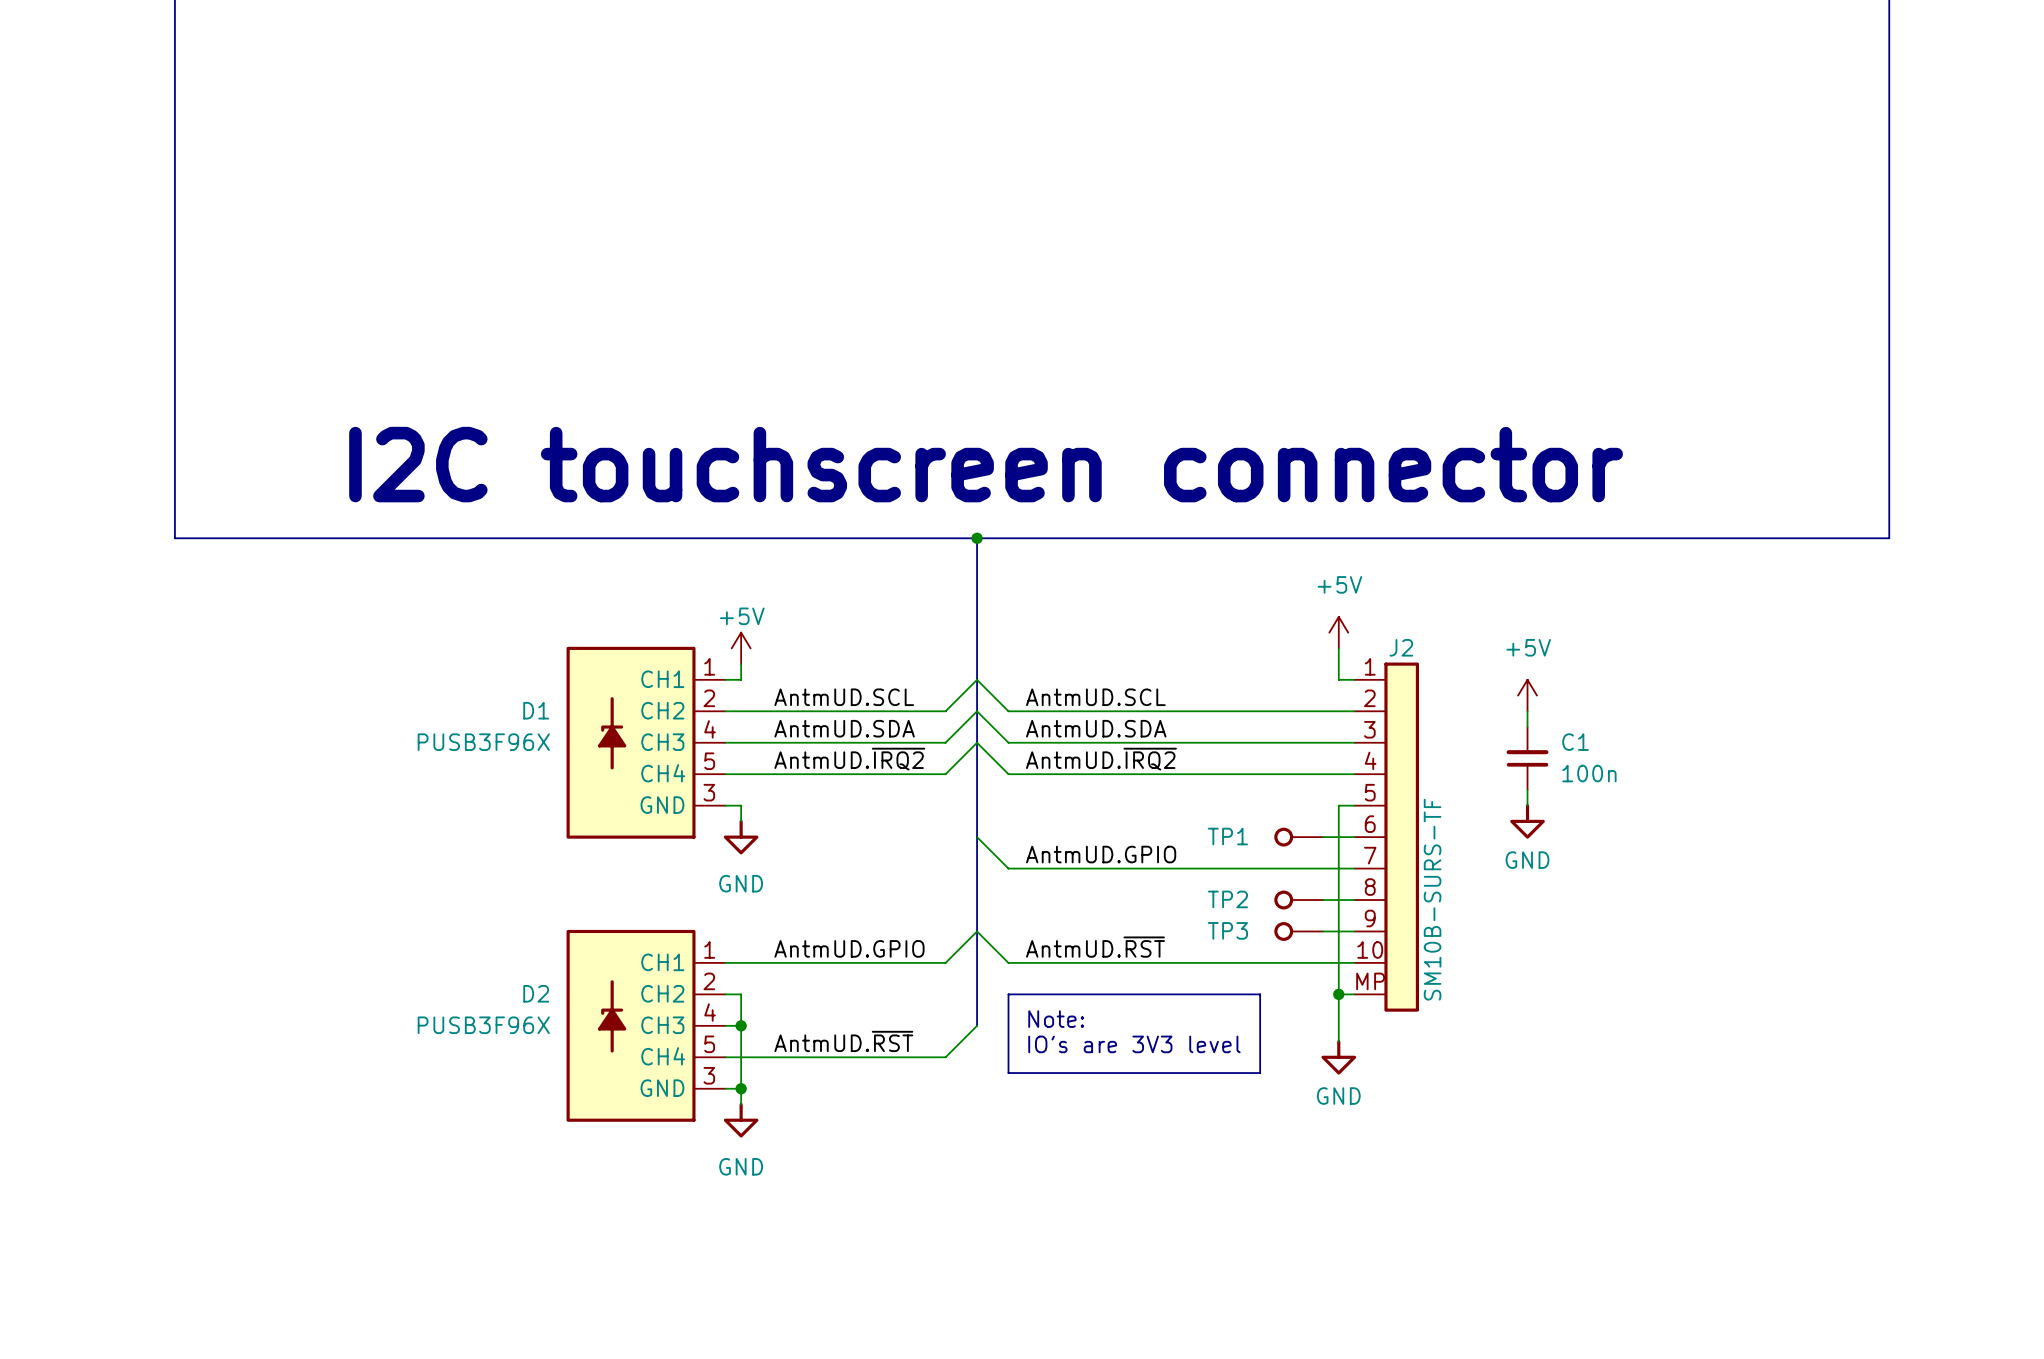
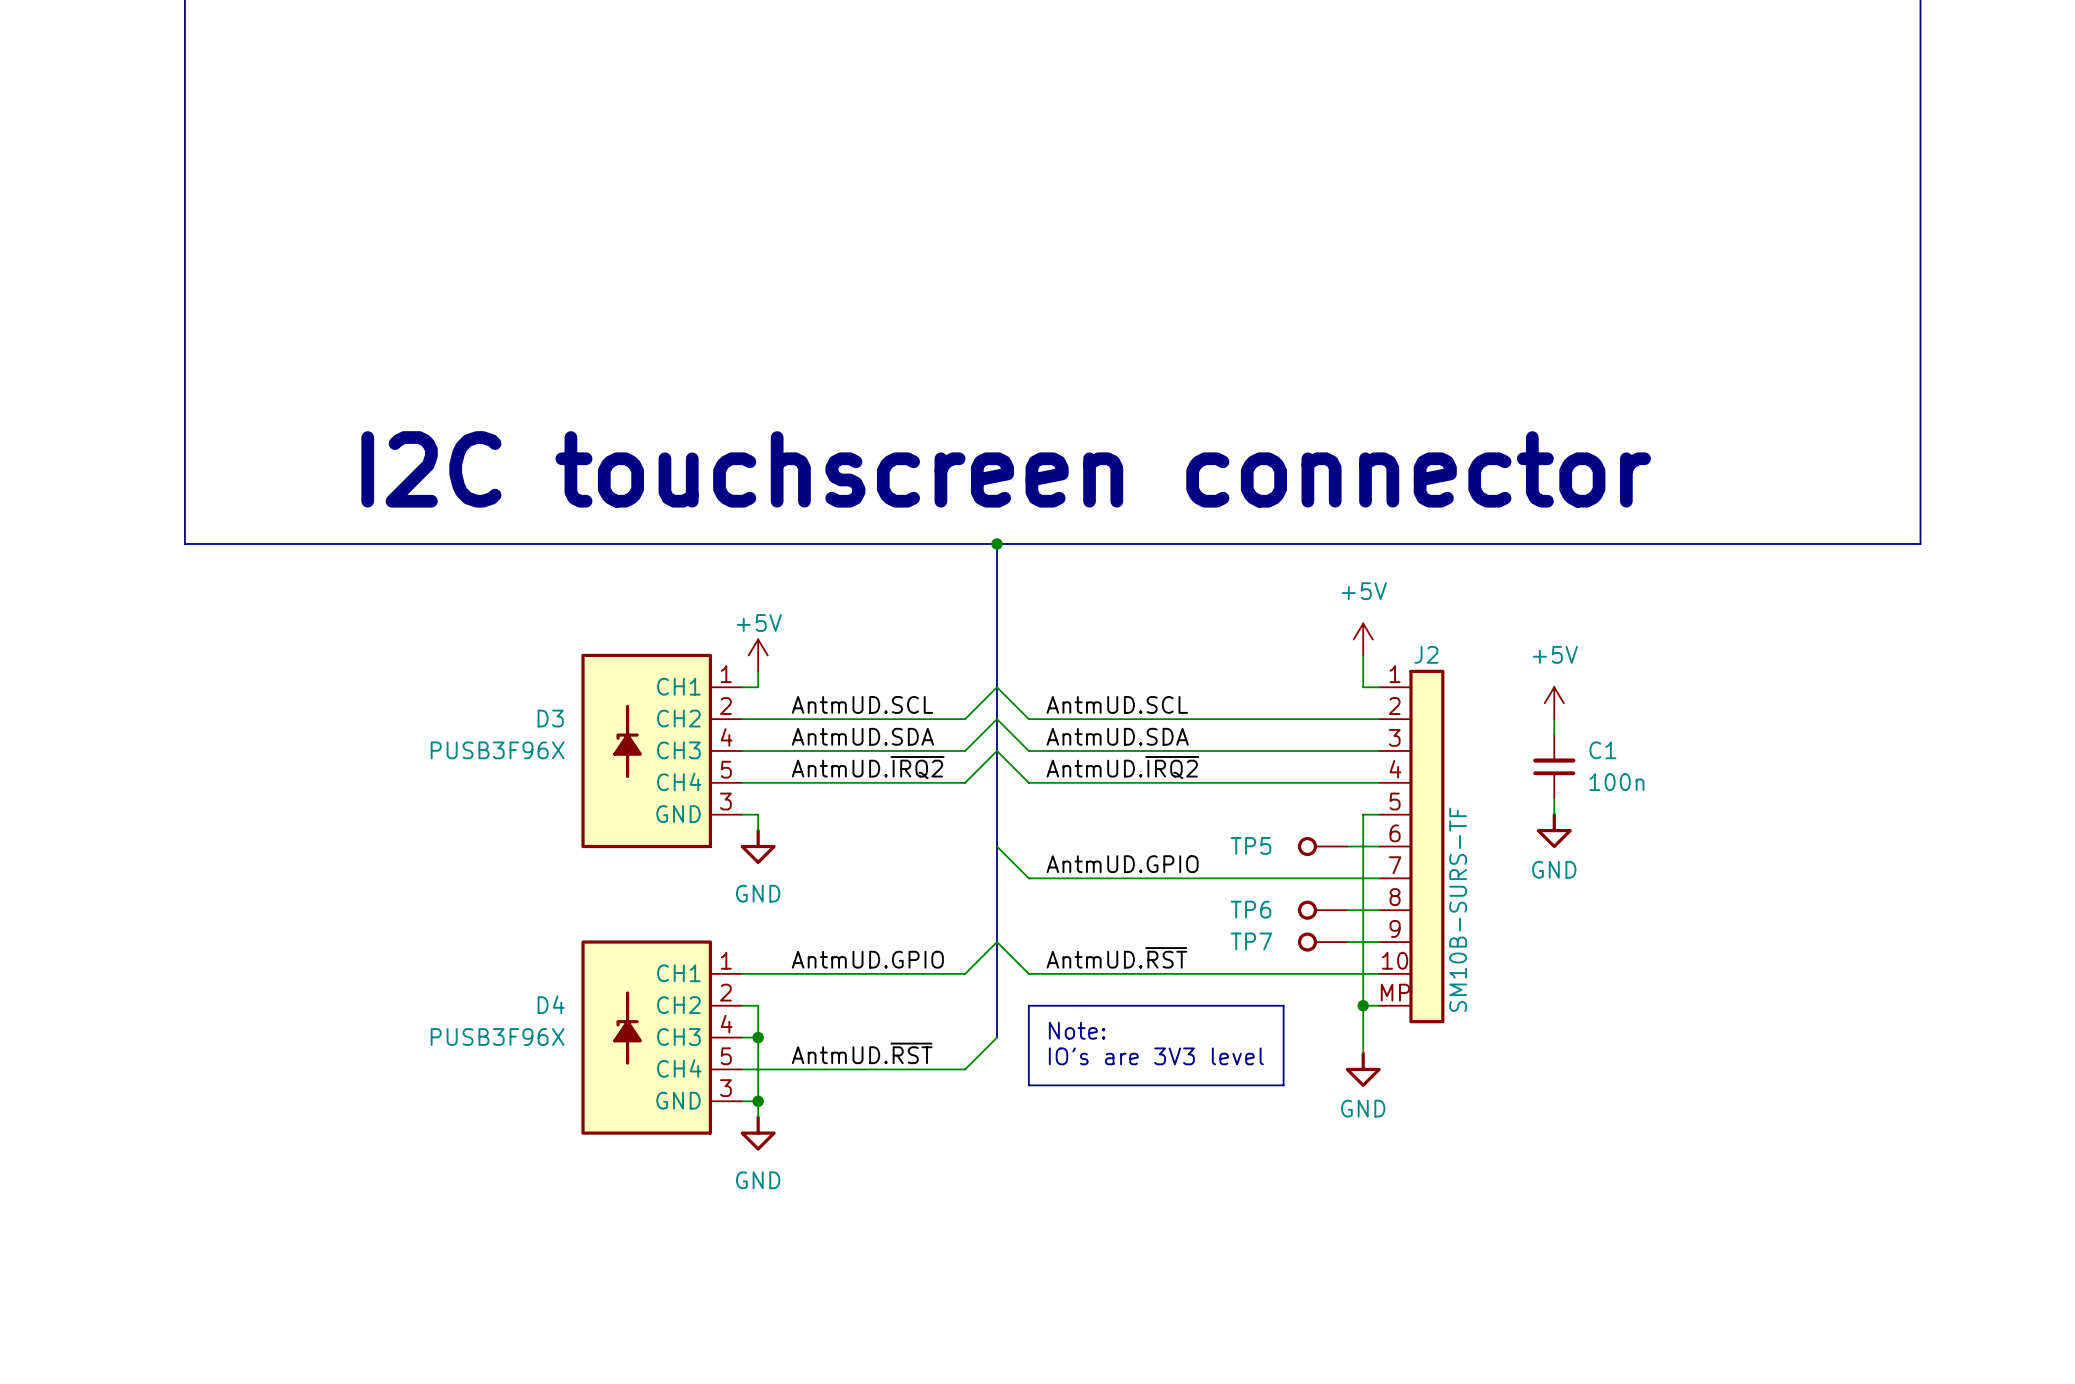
D1 name: D1 (536, 710) -> D3 (550, 718)
TP1 name: TP1 (1227, 836) -> TP5 (1250, 845)
TP2 name: TP2 (1227, 899) -> TP6 (1250, 909)
TP3 name: TP3 (1227, 930) -> TP7 (1251, 941)
D2 name: D2 (536, 993) -> D4 (551, 1004)

